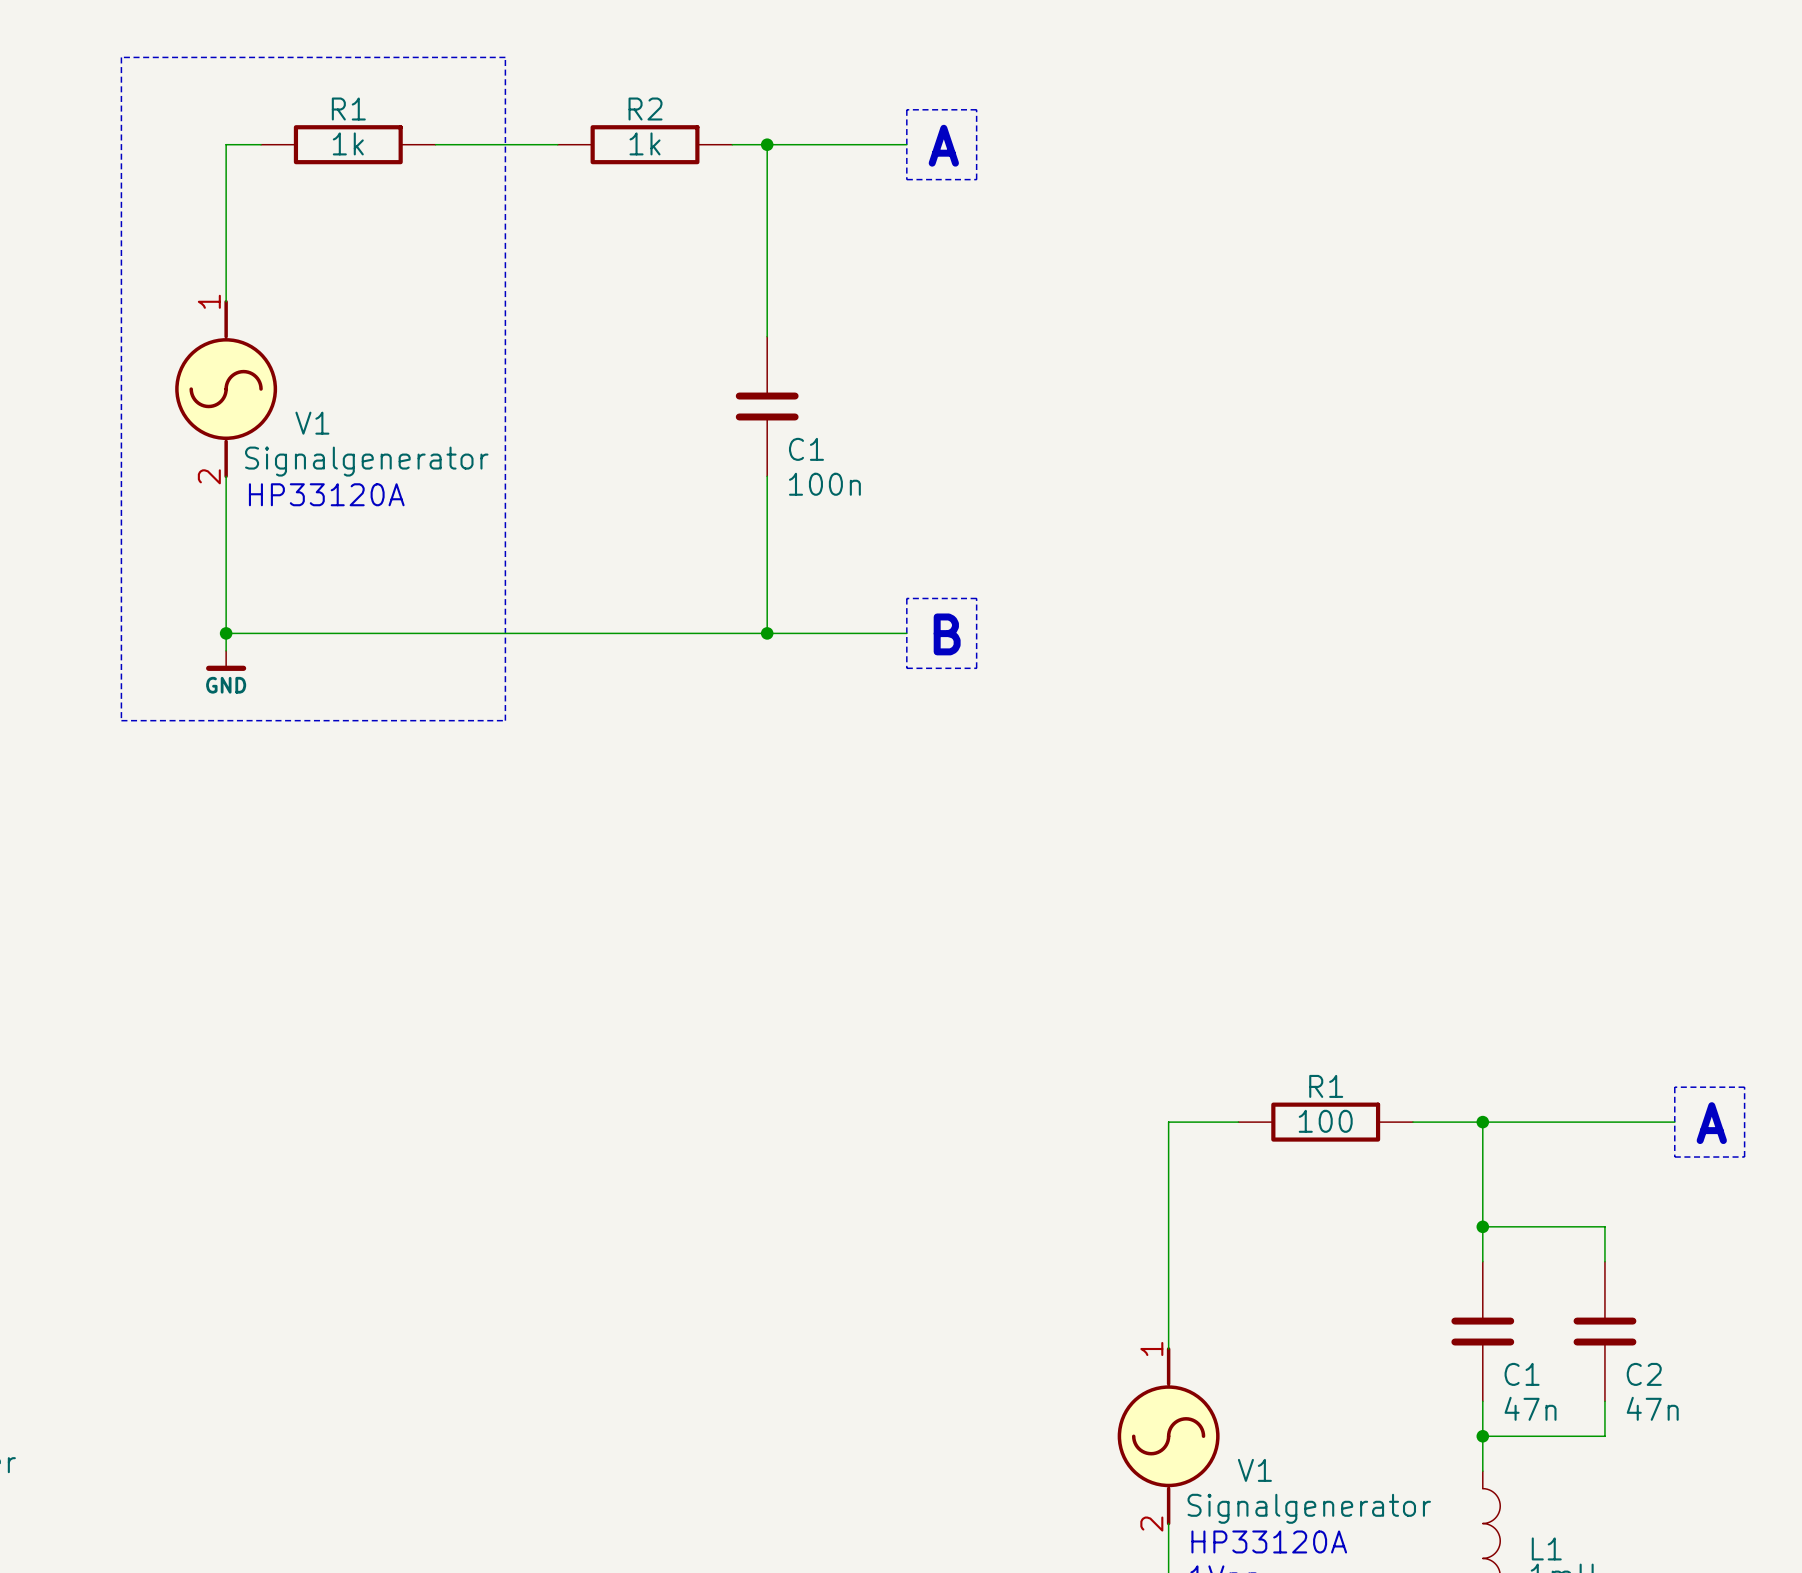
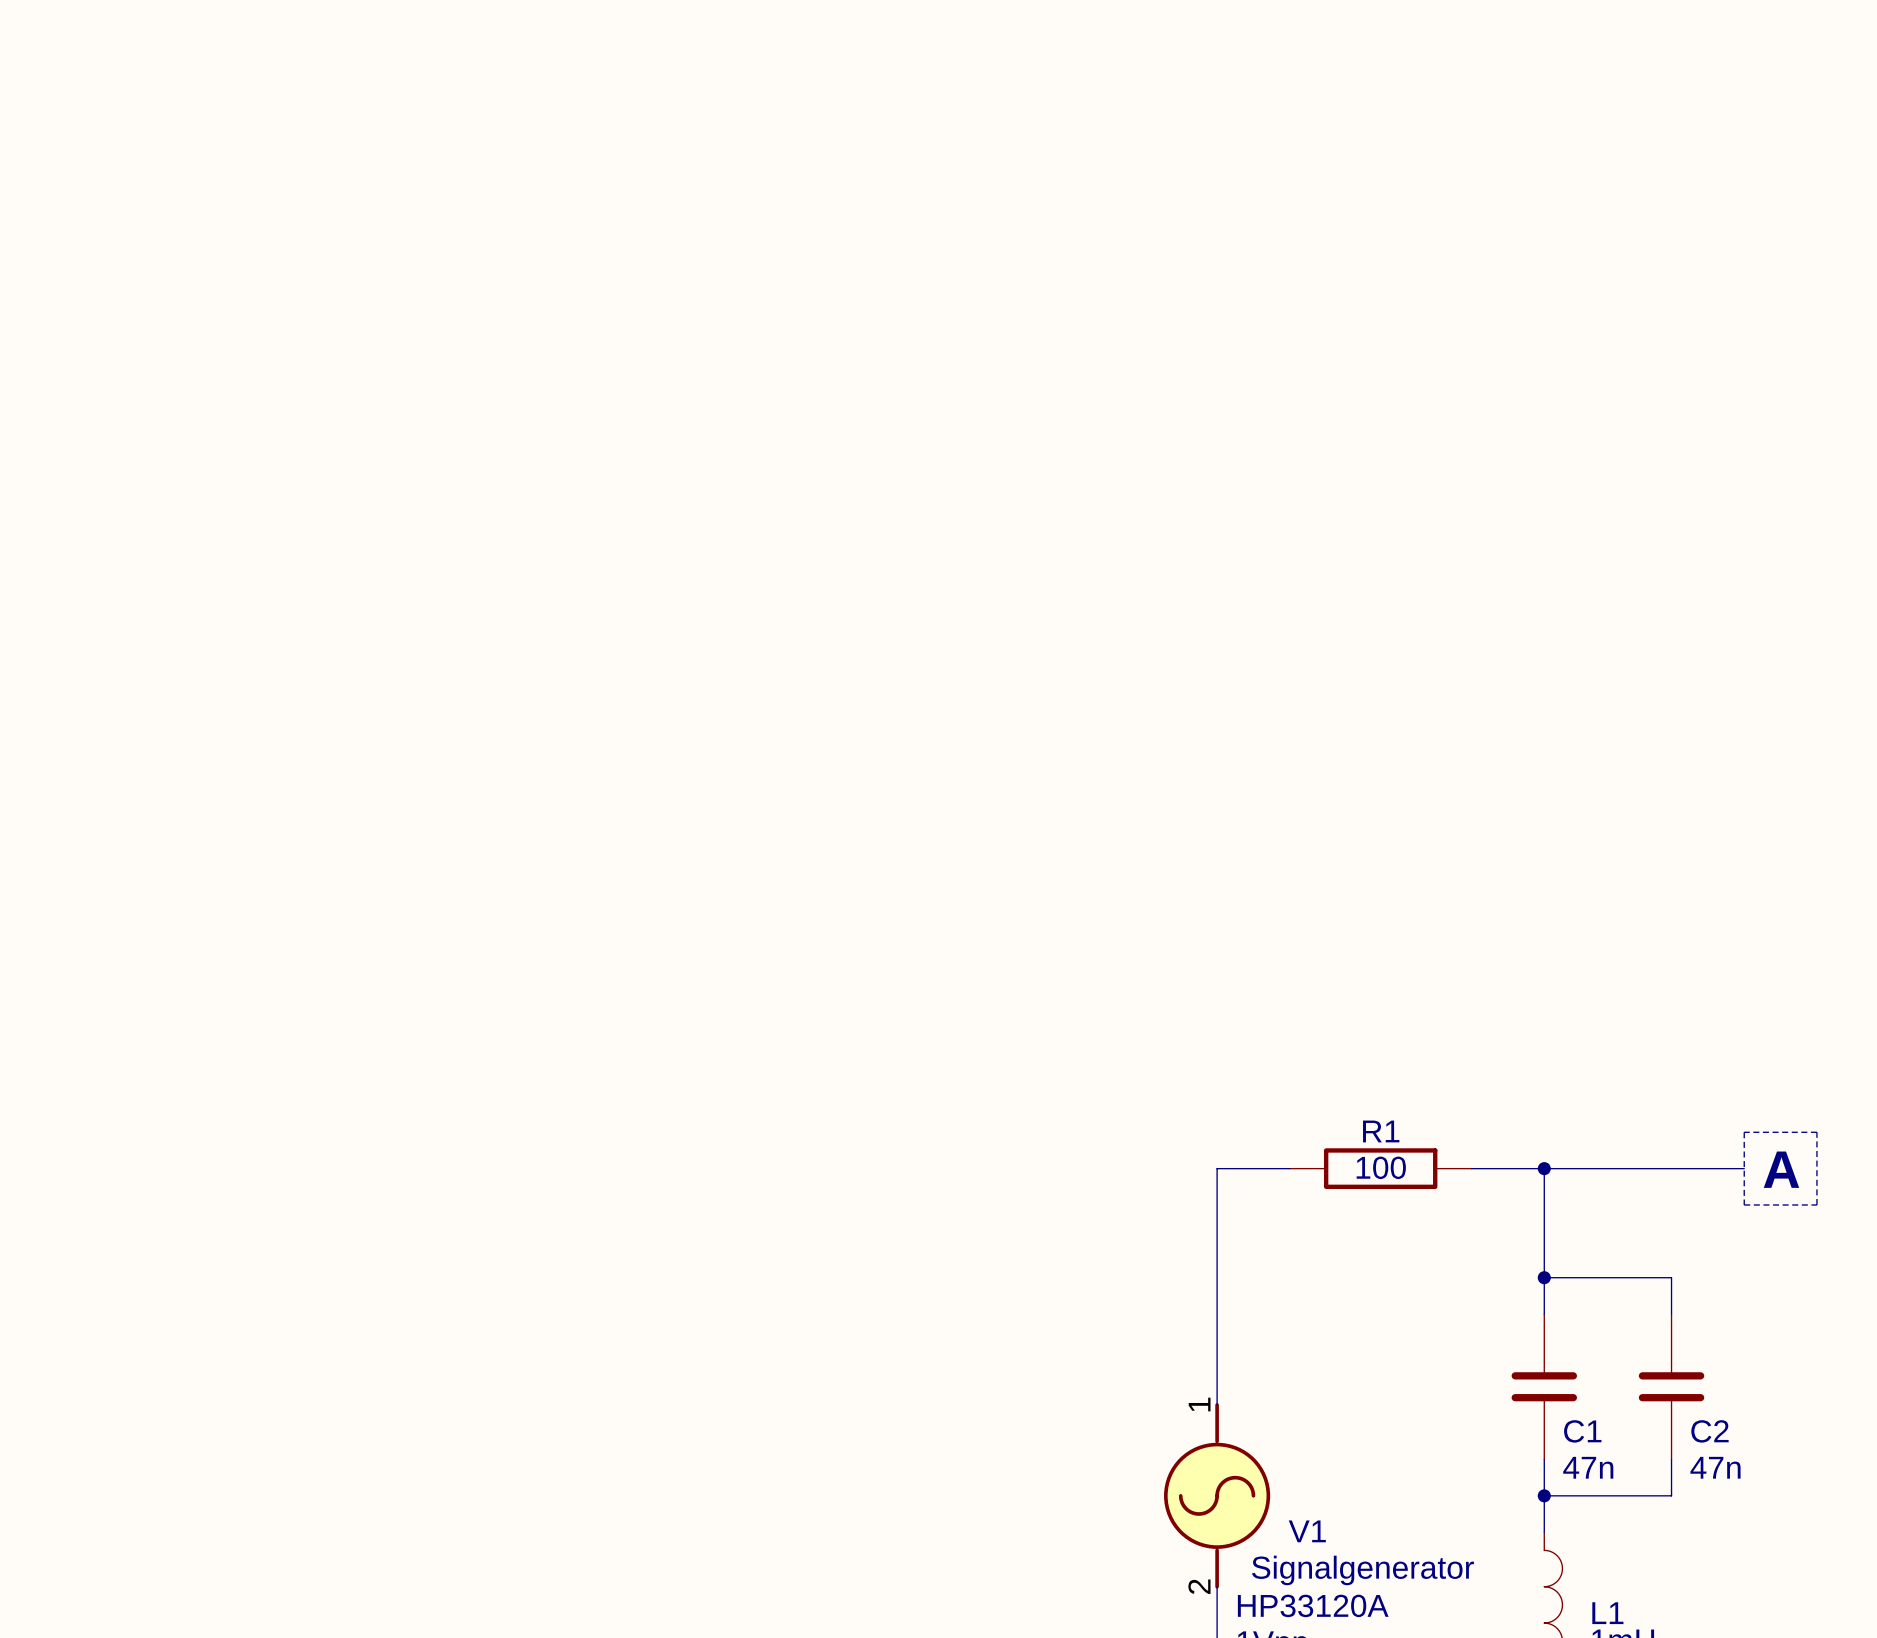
line: (121, 57) (505, 57) (505, 720) (121, 720) (121, 57) -> none
line: (906, 109) (976, 109) (976, 179) (906, 179) (906, 109) -> none
wire: (261, 144) (226, 144) (226, 301) -> none
R1: 1k (348, 144) -> none
wire: (435, 144) (557, 144) -> none
R2: 1k (645, 144) -> none
wire: (732, 144) (906, 144) -> none
wire: (767, 144) (767, 336) -> none
junction: (767, 144) -> none
text: A (943, 145) -> none
V1: Signalgenerator (226, 389) -> none
C1: 100n (767, 406) -> none
wire: (226, 476) (226, 650) -> none
wire: (767, 476) (767, 633) -> none
text: HP33120A (326, 494) -> none
line: (906, 598) (906, 668) (976, 668) (976, 598) (906, 598) -> none
wire: (226, 633) (906, 633) -> none
junction: (226, 633) -> none
junction: (767, 633) -> none
text: B (947, 634) -> none
power symbol: GND (226, 660) -> none

